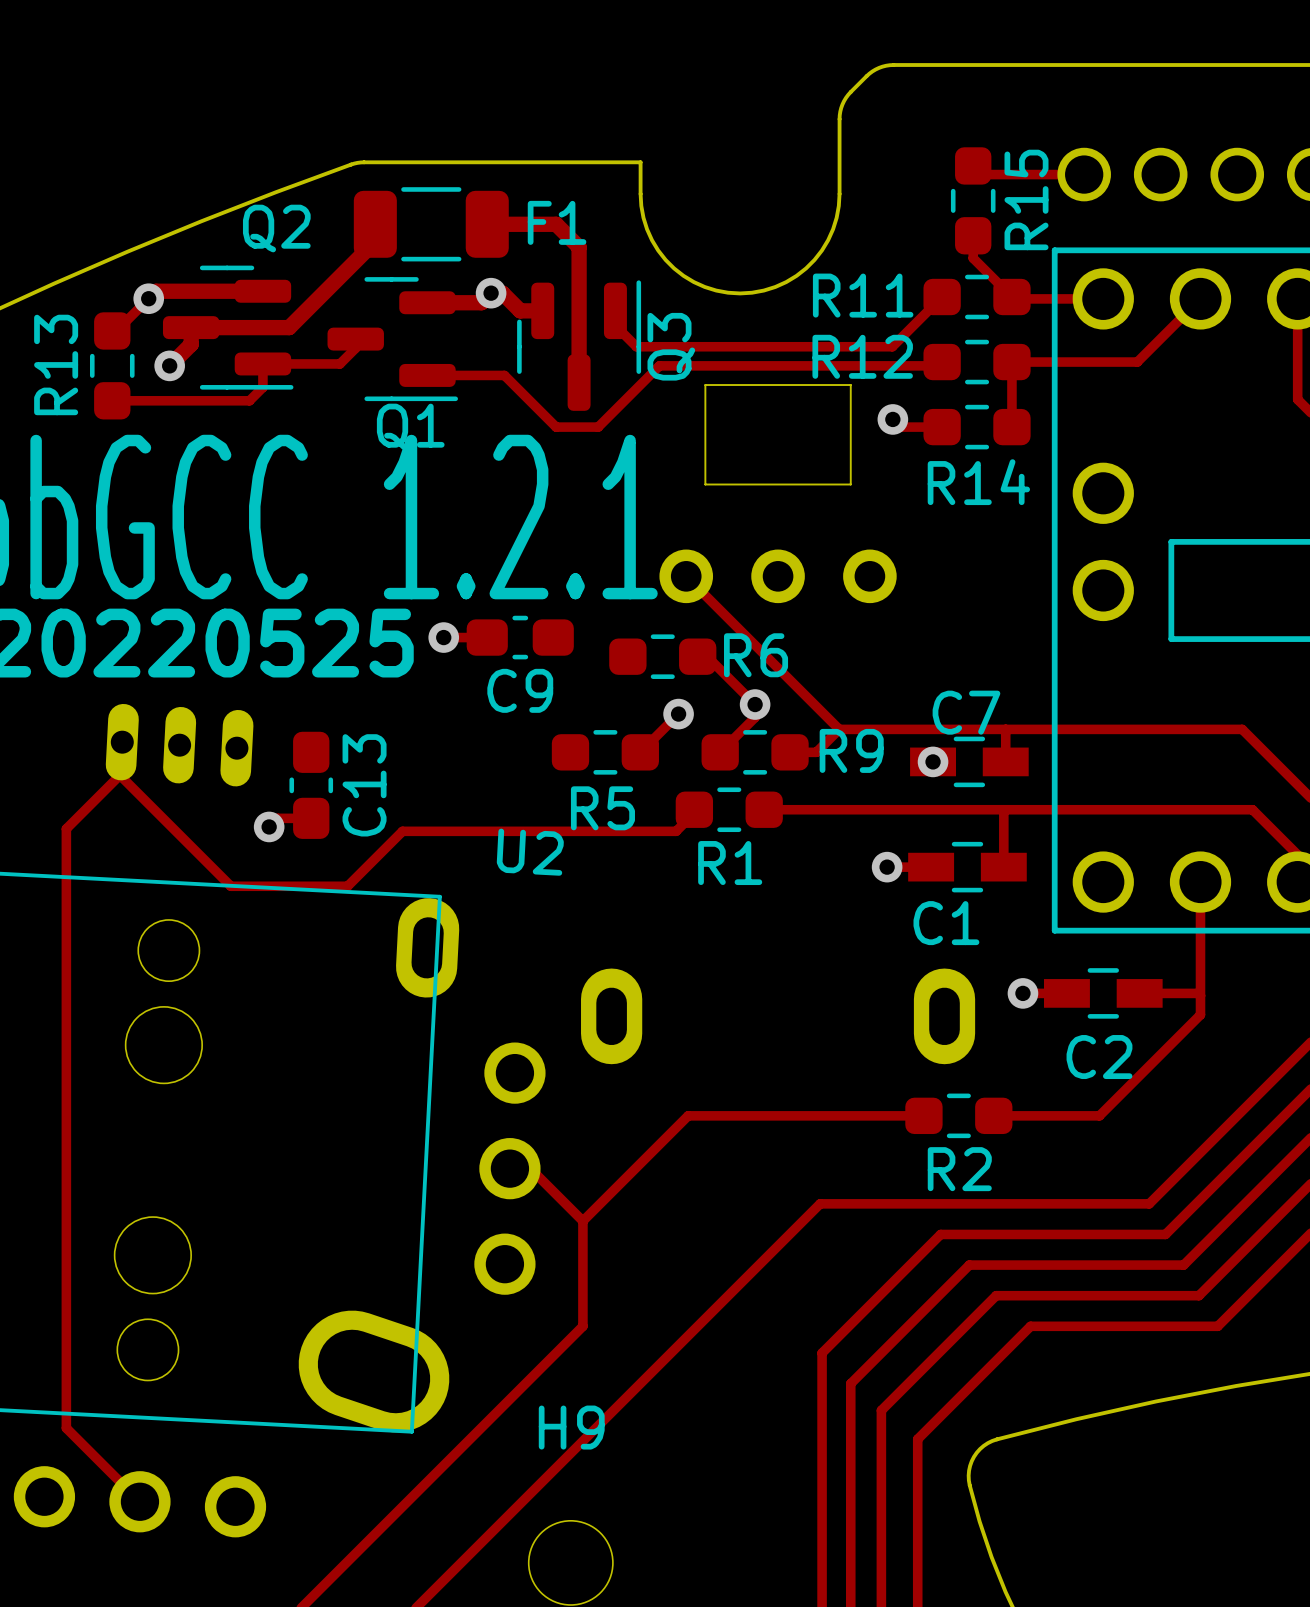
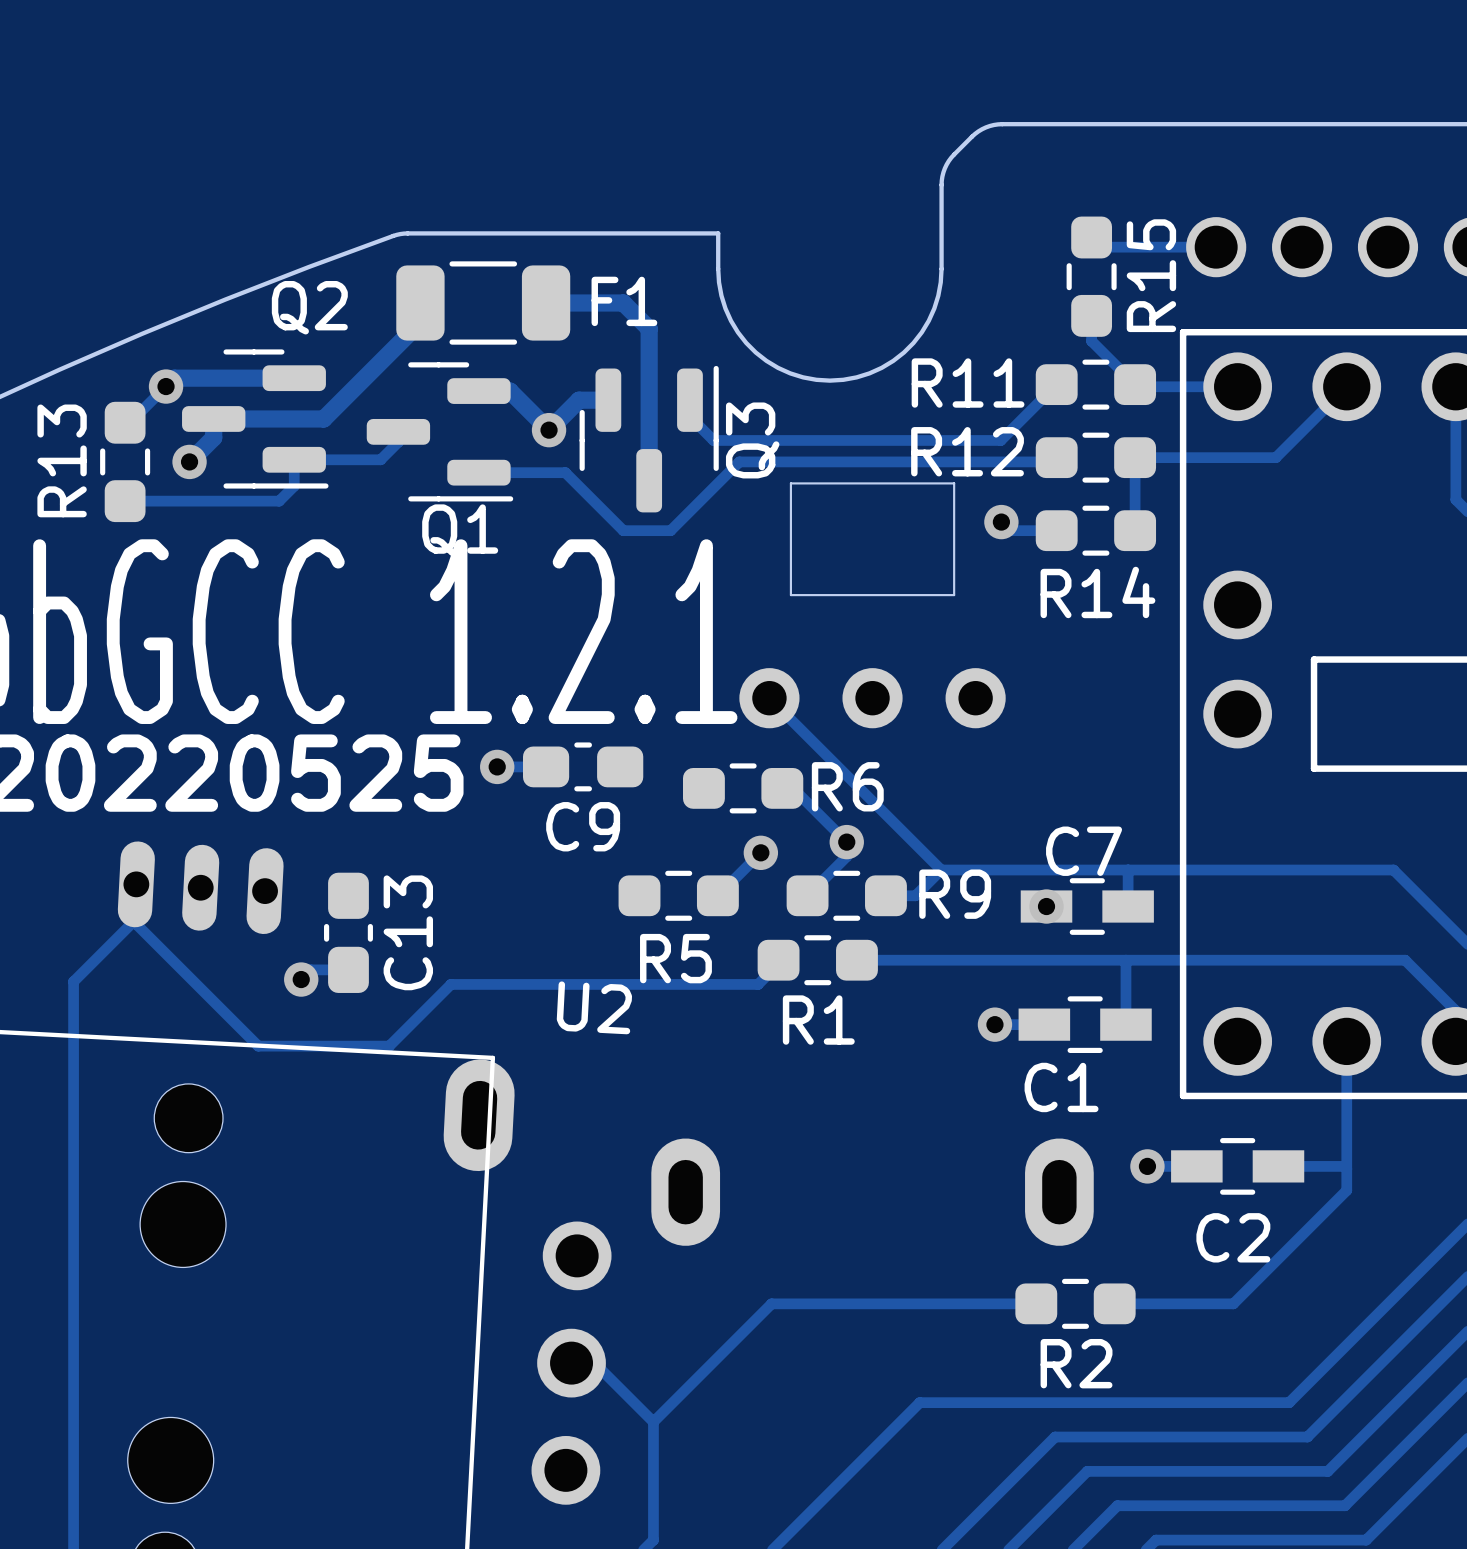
via position: (491, 293) -> (549, 430)
track: (455, 302) (481, 302) (491, 293) (502, 293) (520, 310) -> (509, 391) (549, 430) (579, 400) (583, 400)

